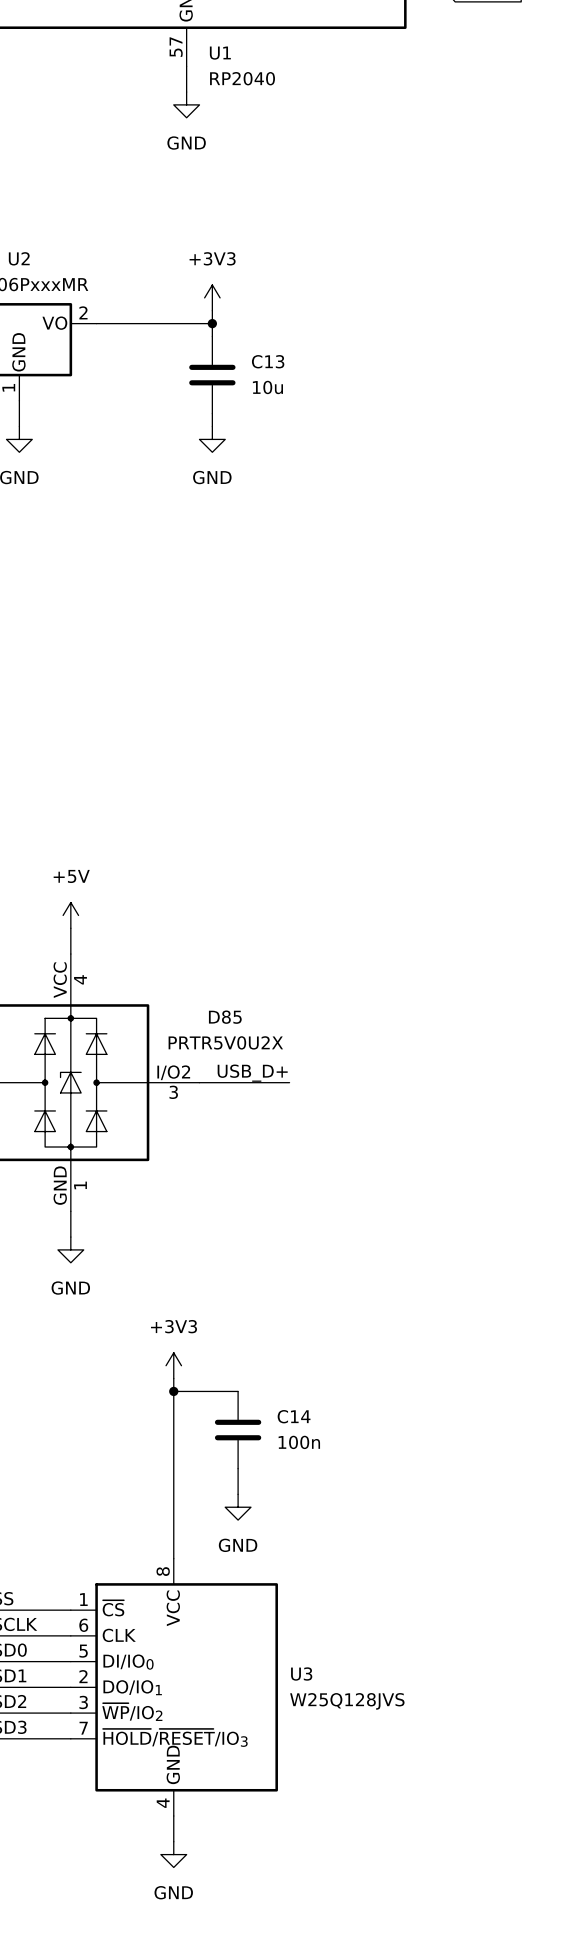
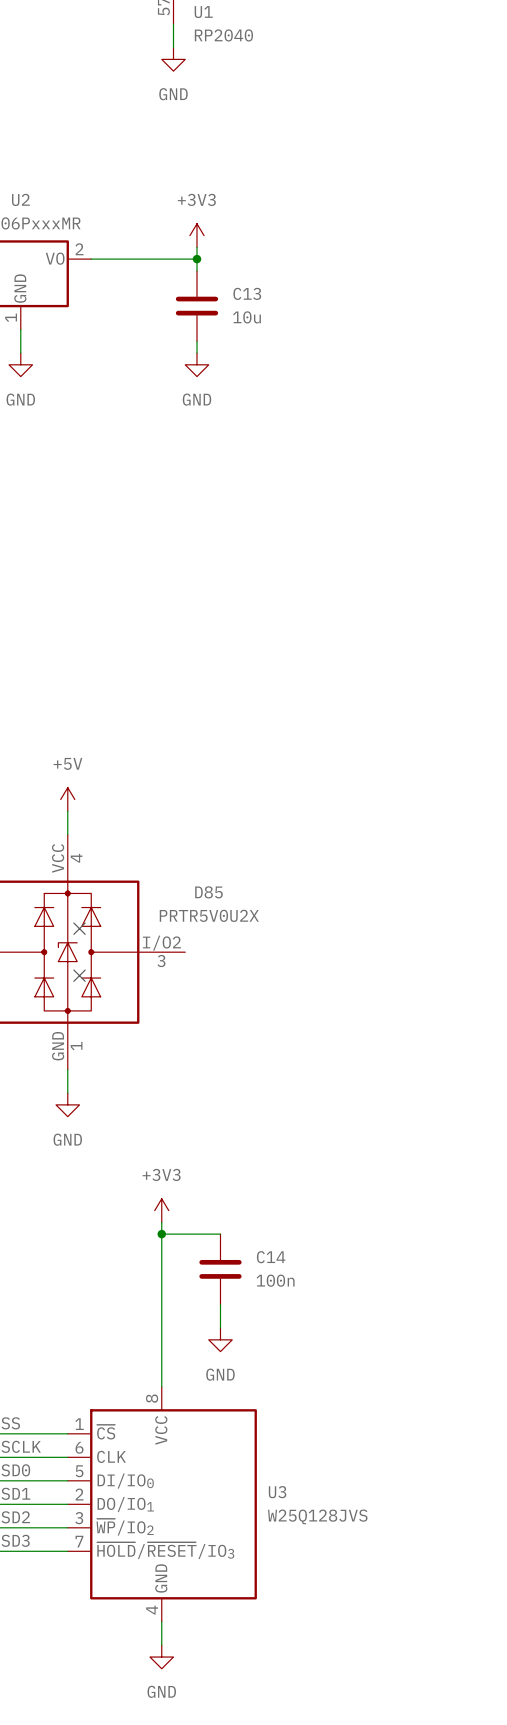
no-connect mark: none -> (79, 928)
label: USB_D+ (252, 1073) -> none
wire: (199, 1082) (289, 1082) -> none
no-connect mark: none -> (79, 975)

